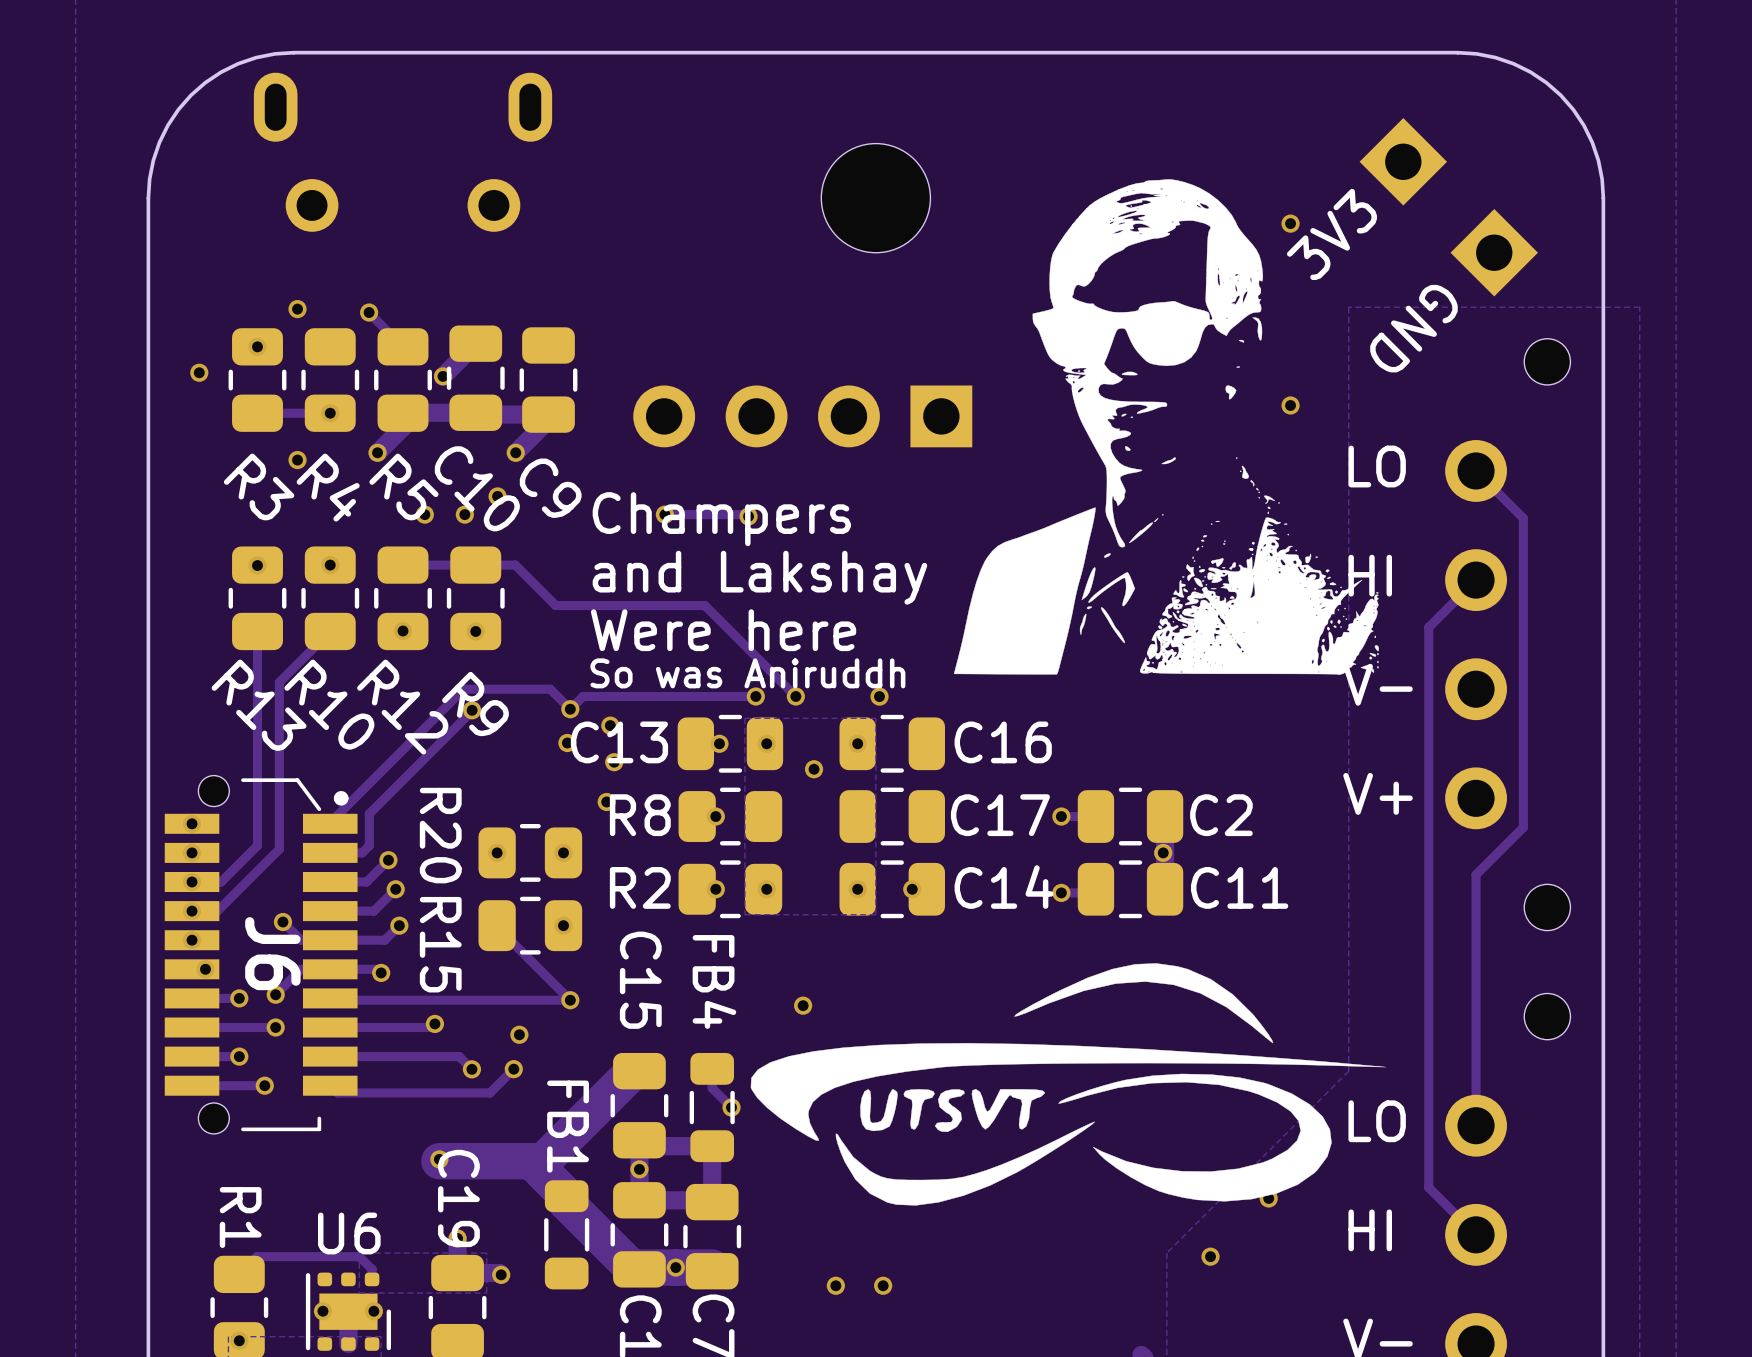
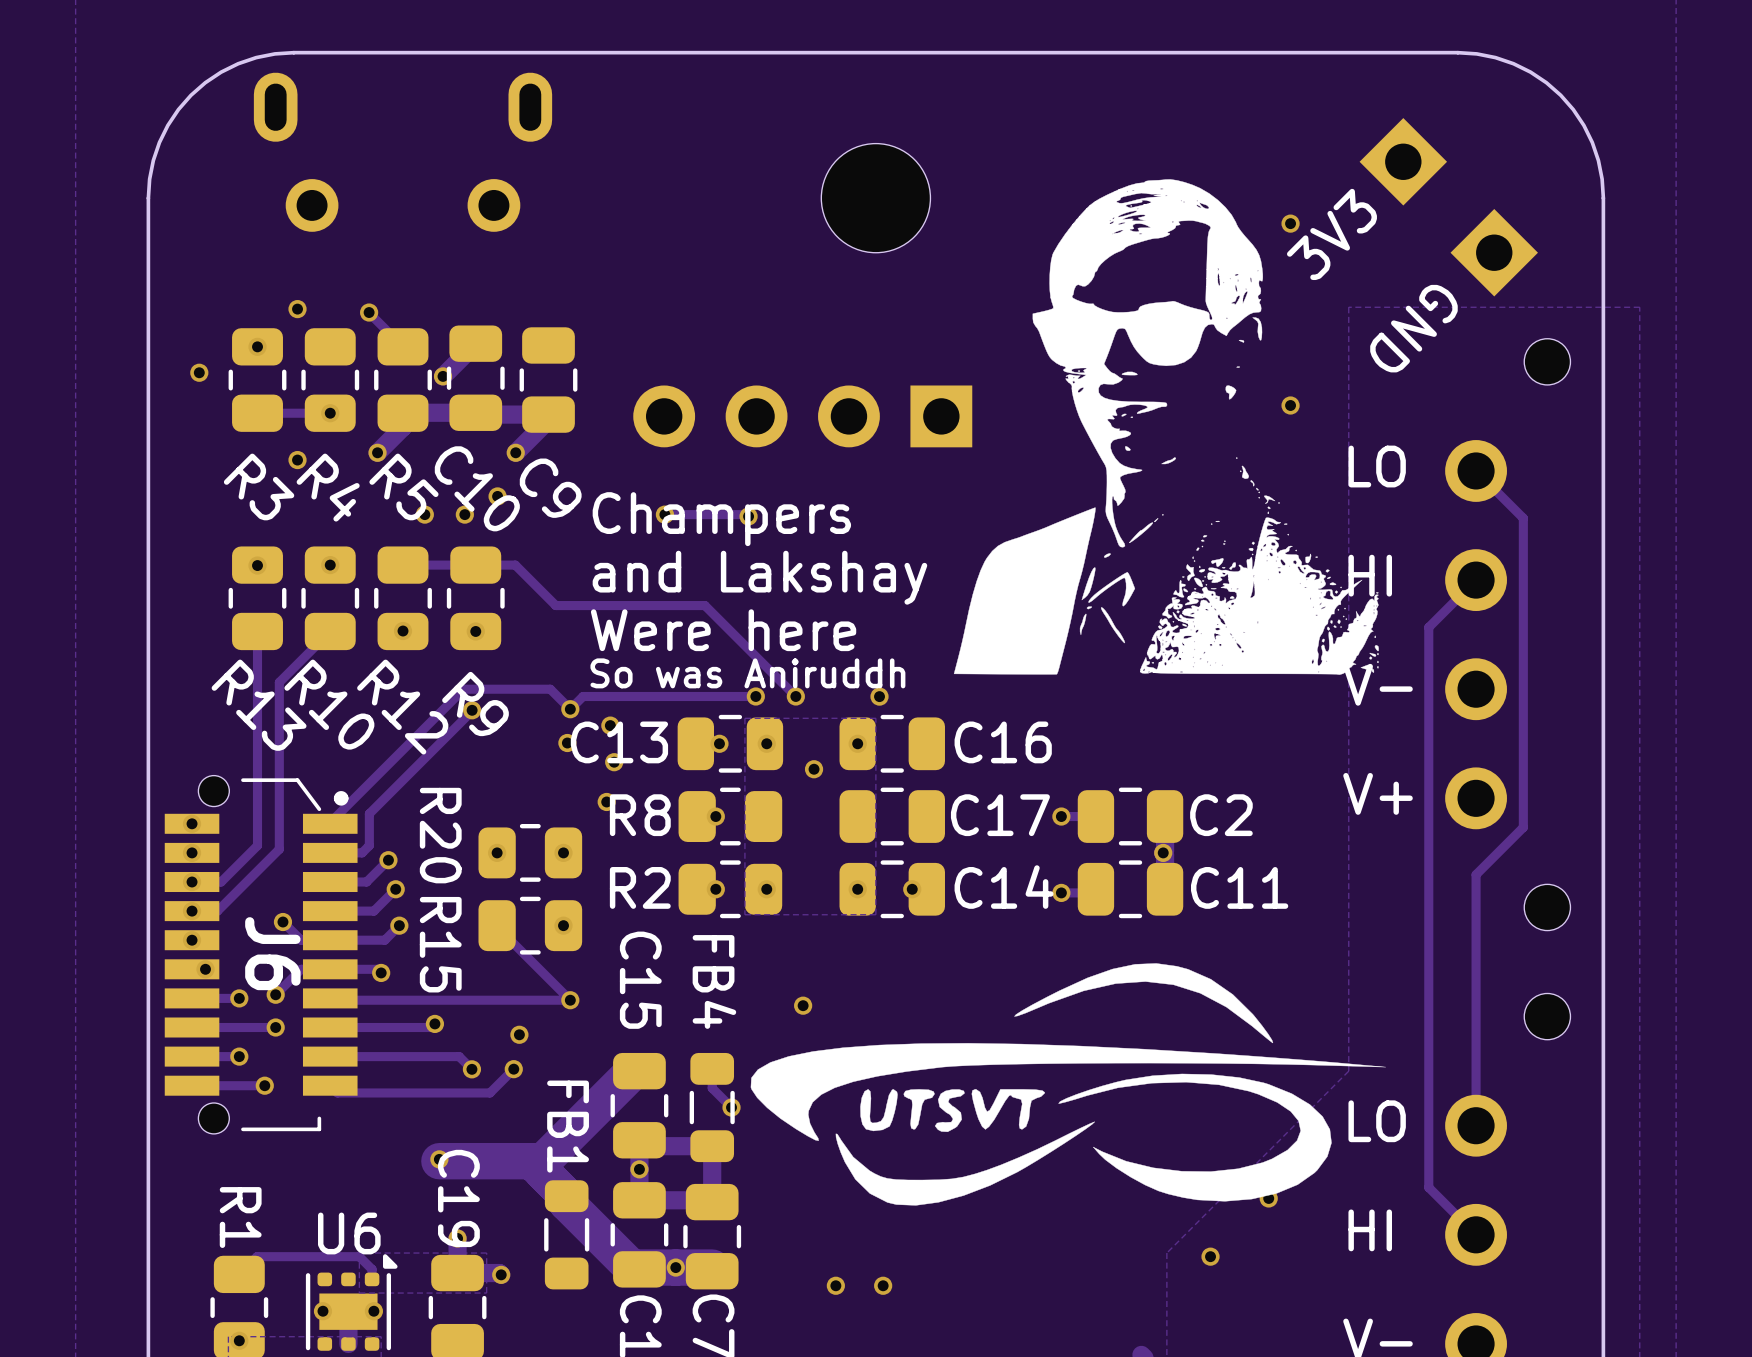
U6 footprint: [305, 1272, 392, 1351] -> [305, 1254, 398, 1351]

